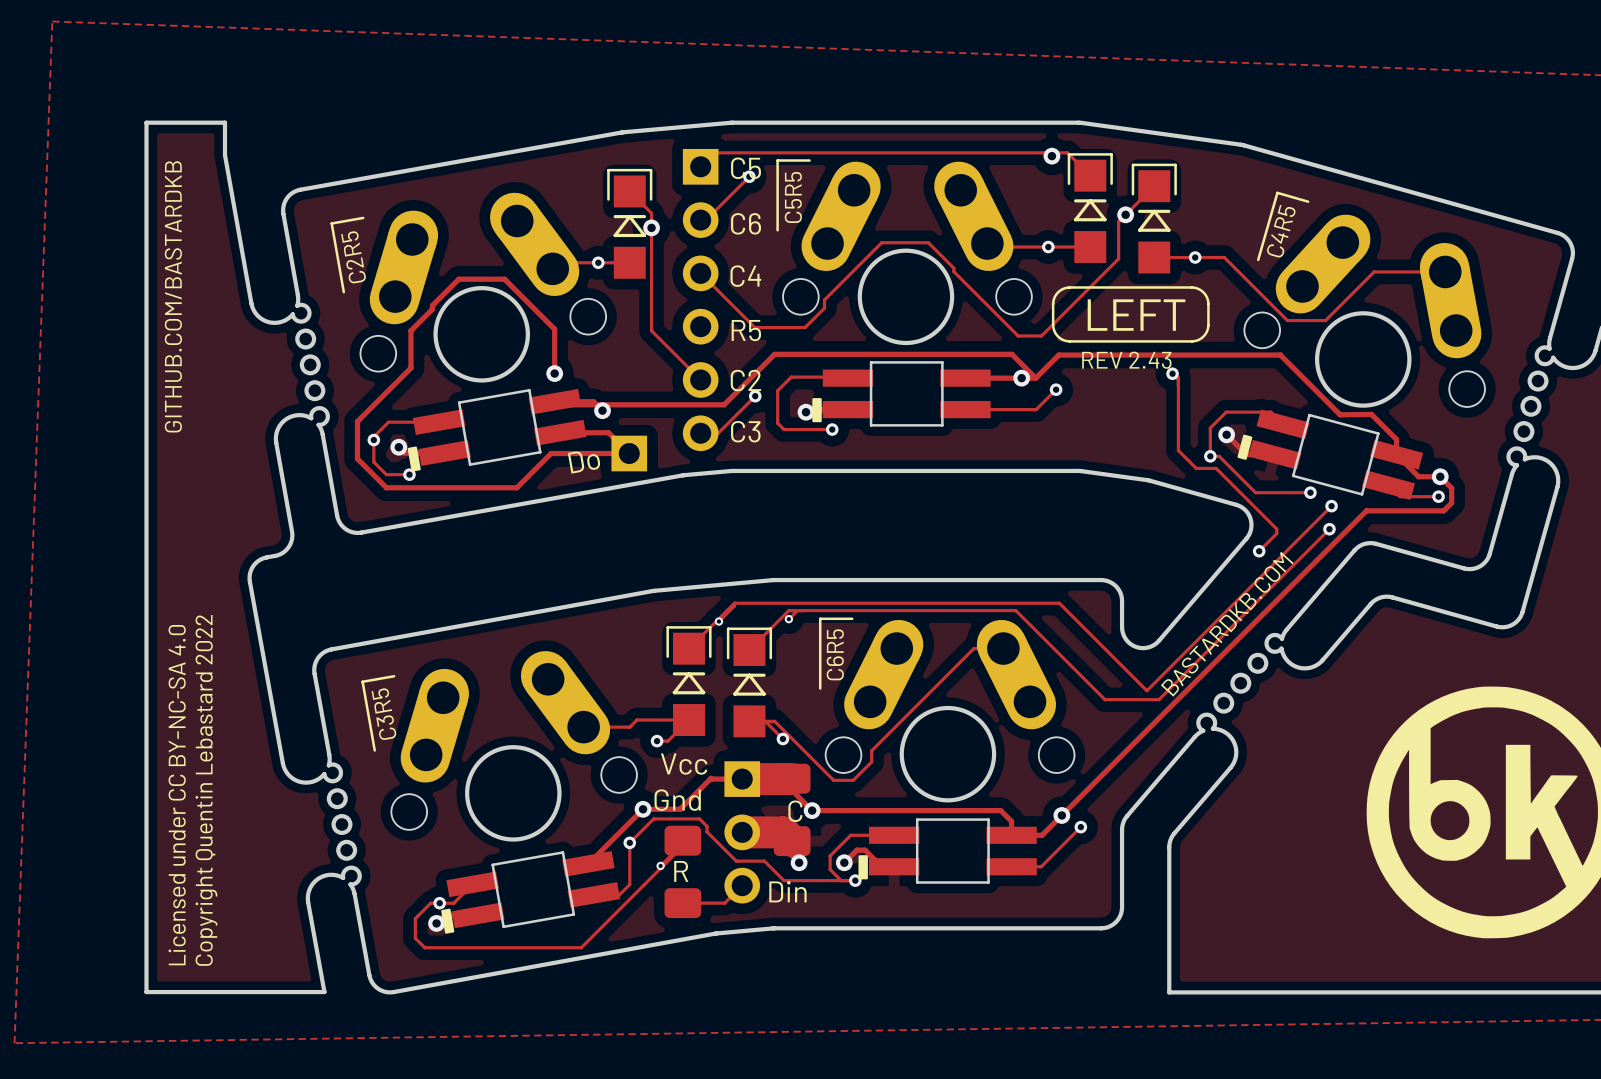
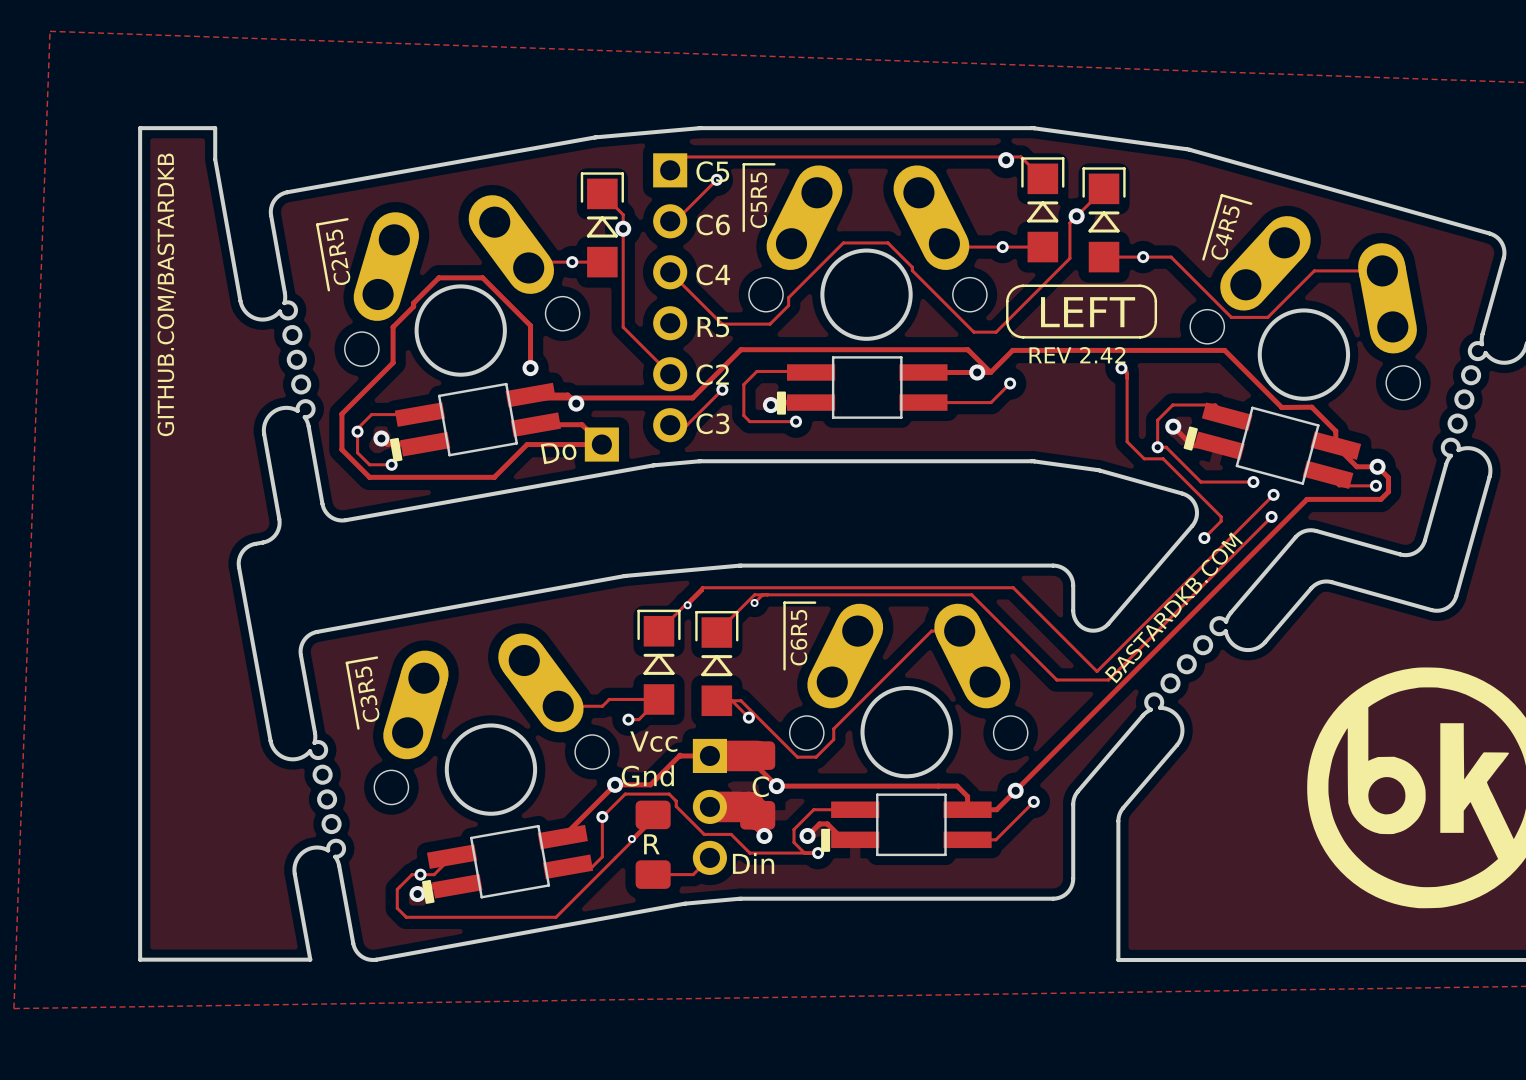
text: REV 2.43 (1126, 360) -> REV 2.42 (1077, 355)
text: Copyright Quentin Lebastard 2022 (206, 790) -> none
text: Licensed under CC BY-NC-SA 4.0 (177, 795) -> none

